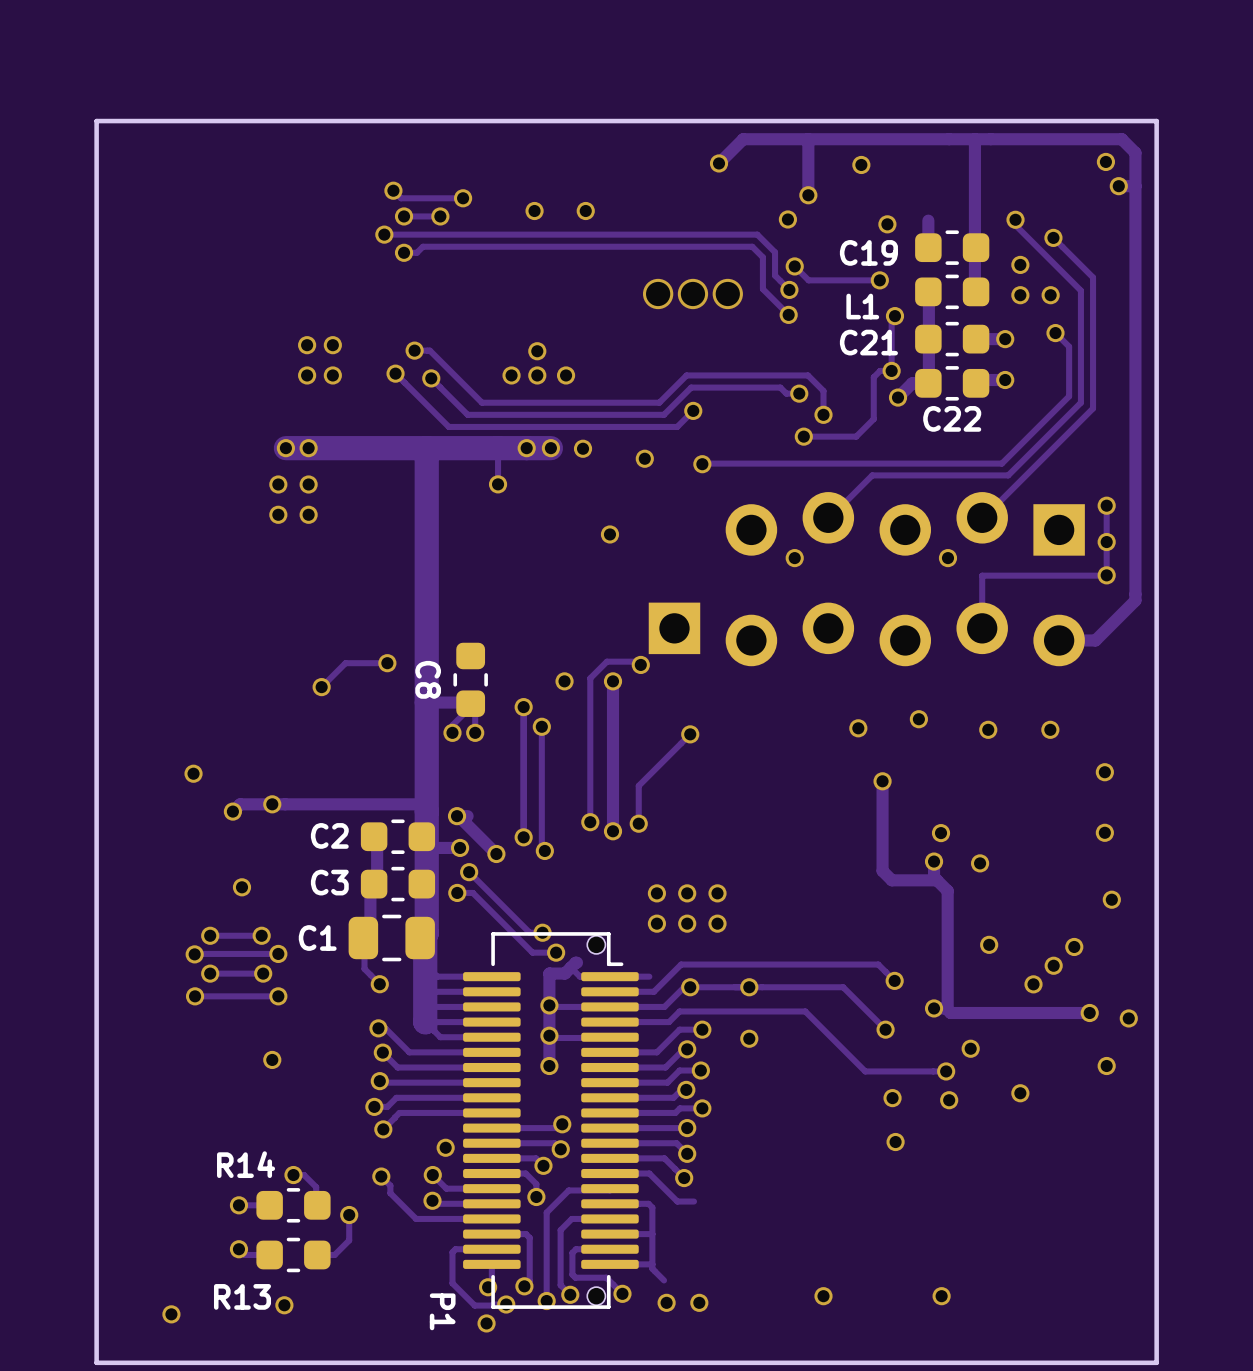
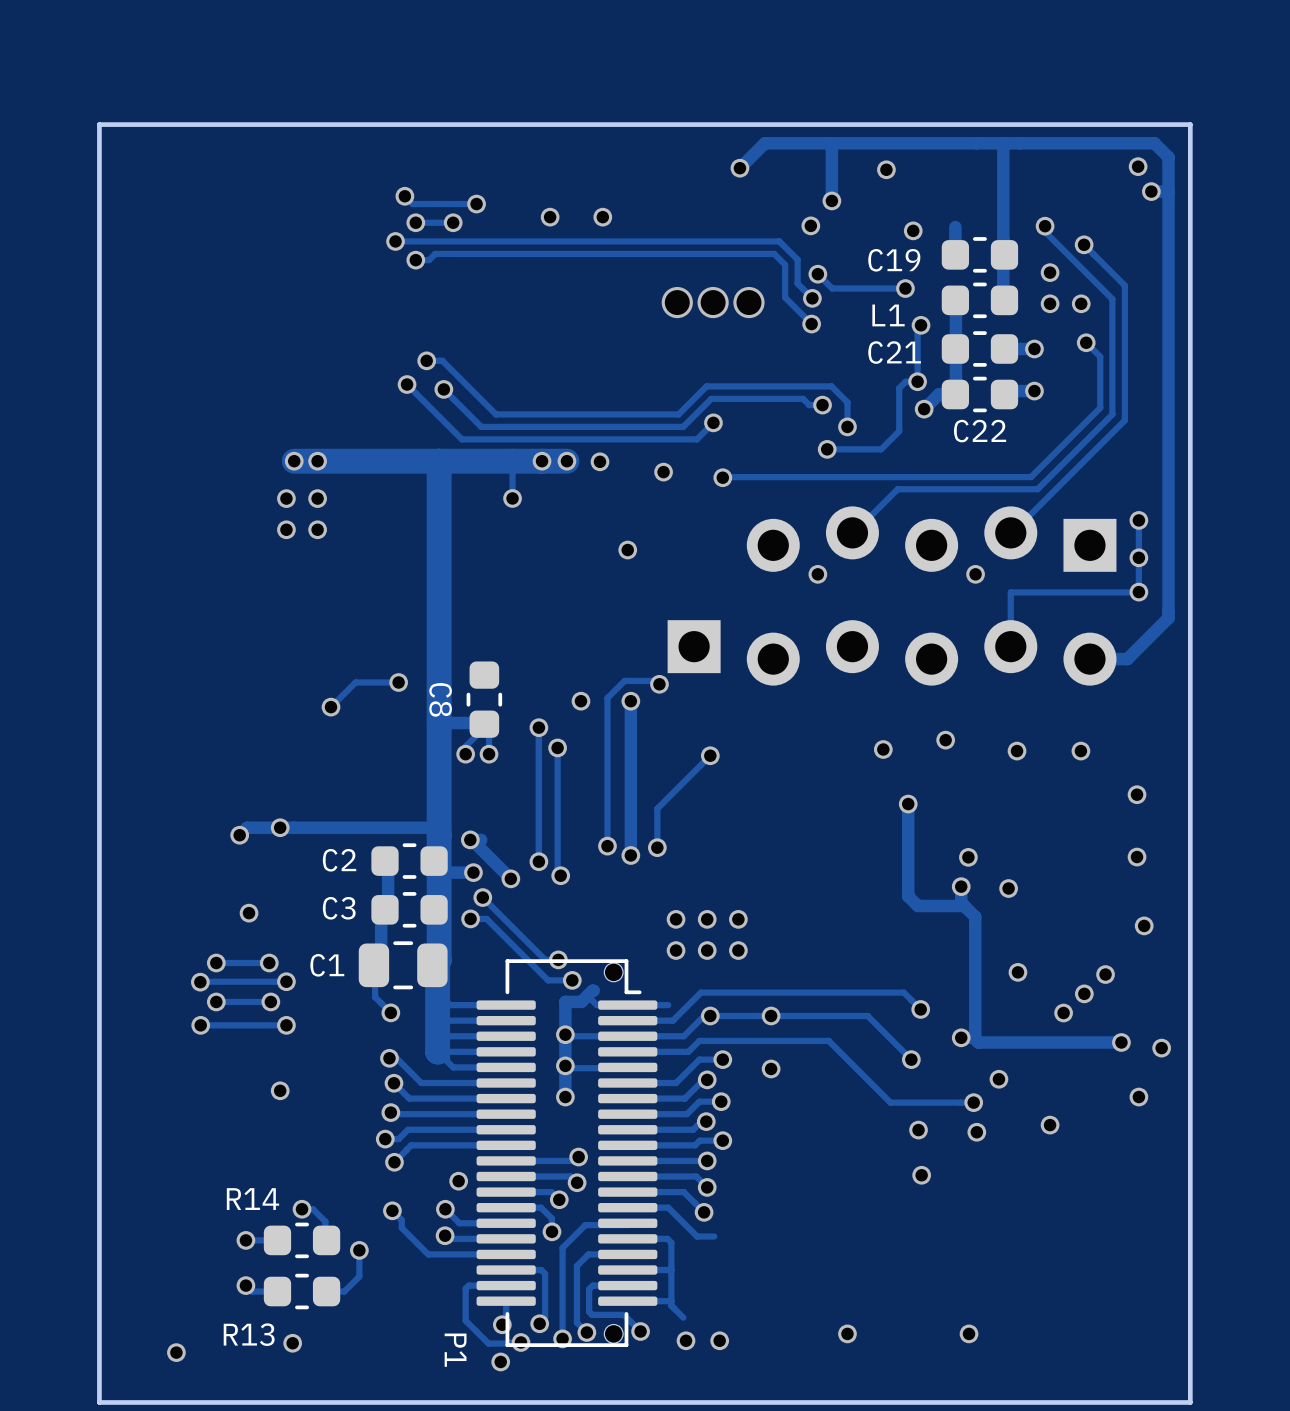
via: (307, 345) -> none
via: (332, 345) -> none
via: (537, 351) -> none
via: (307, 375) -> none
via: (332, 375) -> none
via: (511, 375) -> none
via: (537, 375) -> none
via: (566, 375) -> none
via: (193, 773) -> none

